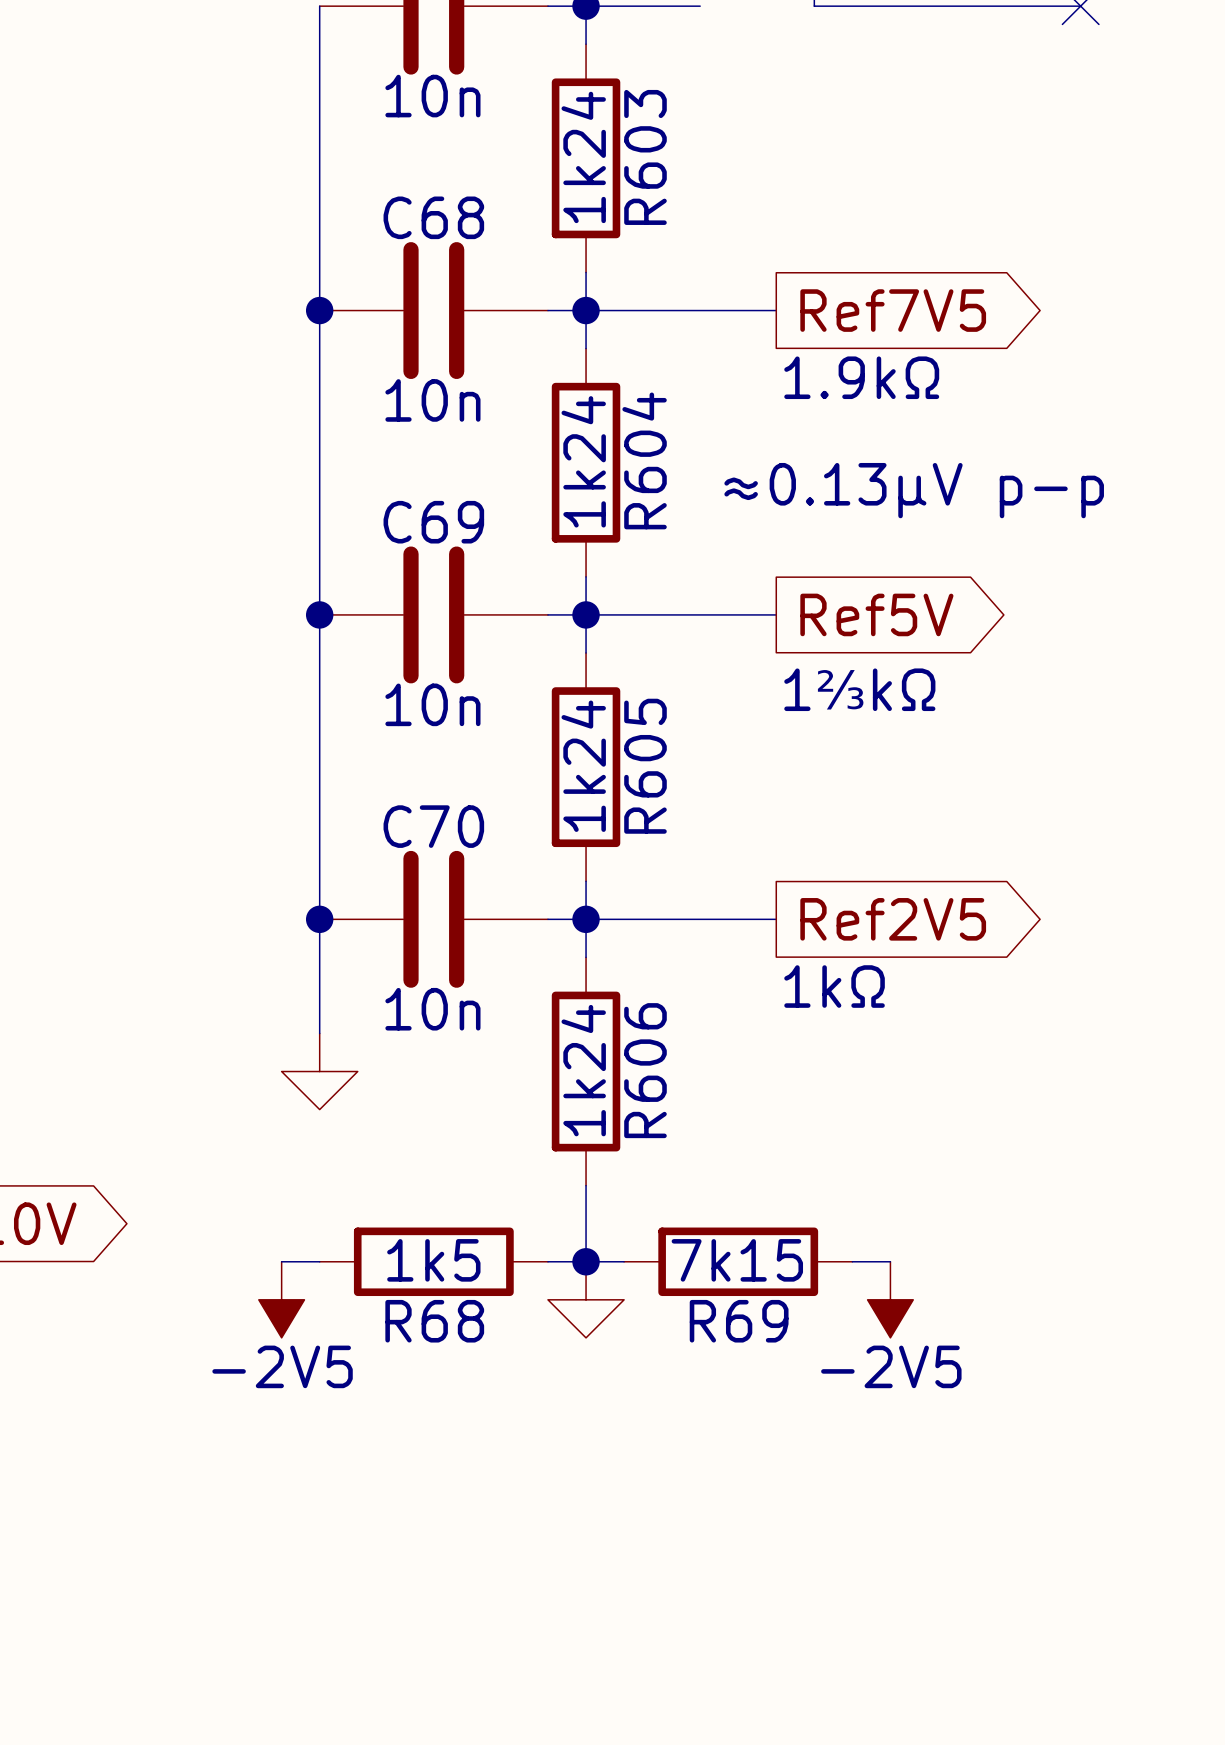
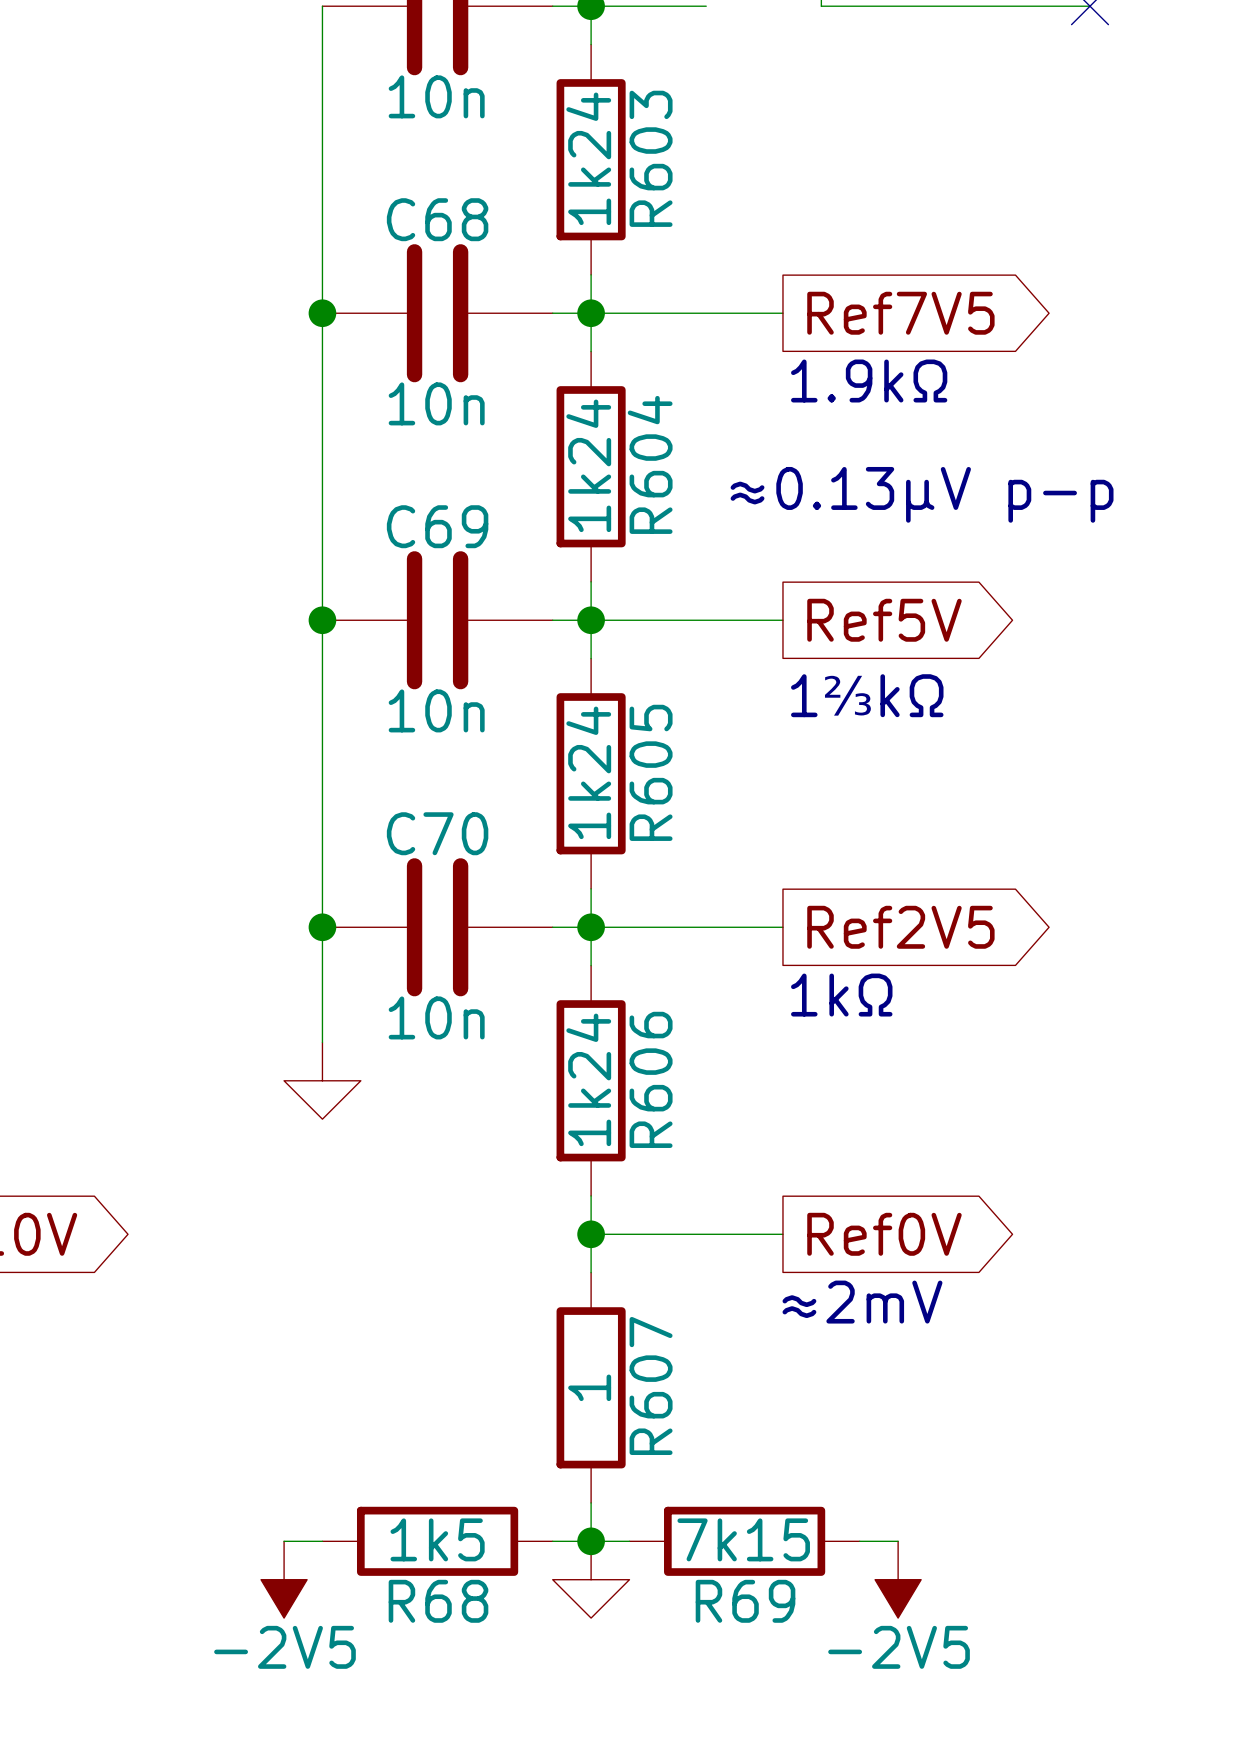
wire: none -> (591, 1234) (782, 1234)
global label: none -> Ref0V (884, 1234)
wire: (281, 1261) (319, 1261) -> (284, 1541) (322, 1541)
R68 position: (433, 1261) -> (437, 1541)
wire: (547, 1261) (624, 1261) -> (552, 1541) (629, 1541)
junction position: (586, 1261) -> (591, 1234)
R69 position: (738, 1261) -> (744, 1541)
wire: (852, 1261) (890, 1261) -> (859, 1541) (898, 1541)
text: none -> ≈2mV (862, 1302)
power symbol position: -2V5 (281, 1299) -> -2V5 (284, 1579)
power symbol position: (586, 1299) -> (591, 1579)
power symbol position: -2V5 (890, 1299) -> -2V5 (898, 1579)
R607: none -> 1 (591, 1387)
wire: none -> (591, 1502) (591, 1541)
junction: none -> (591, 1541)

